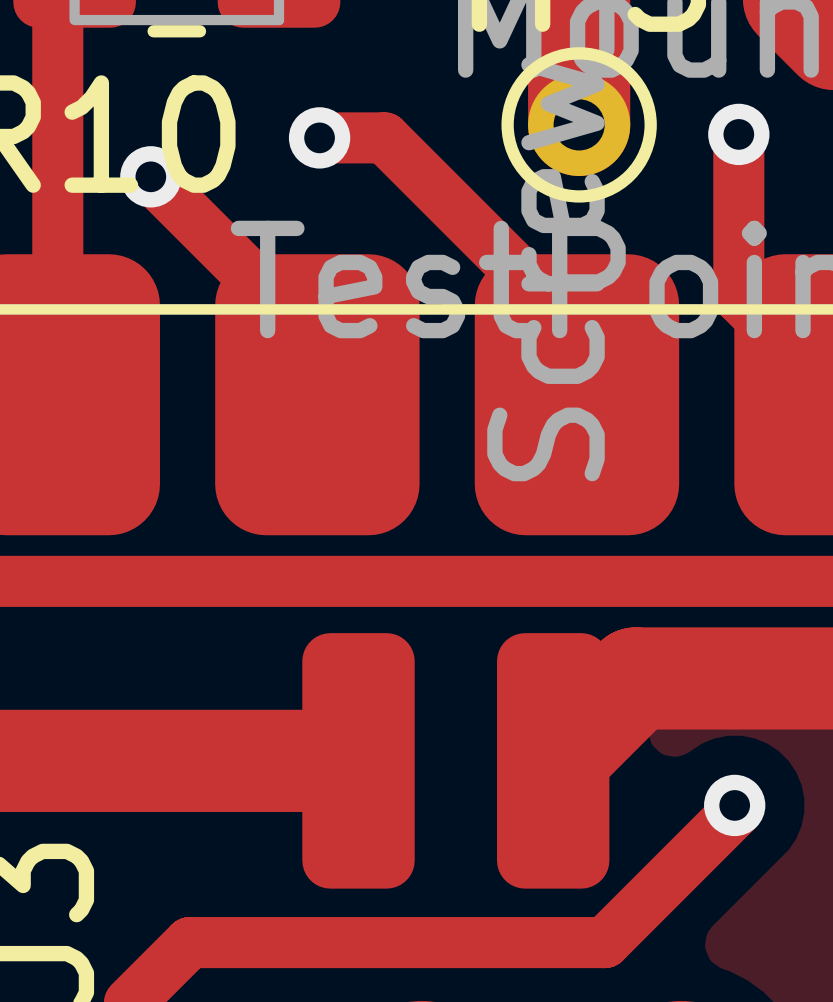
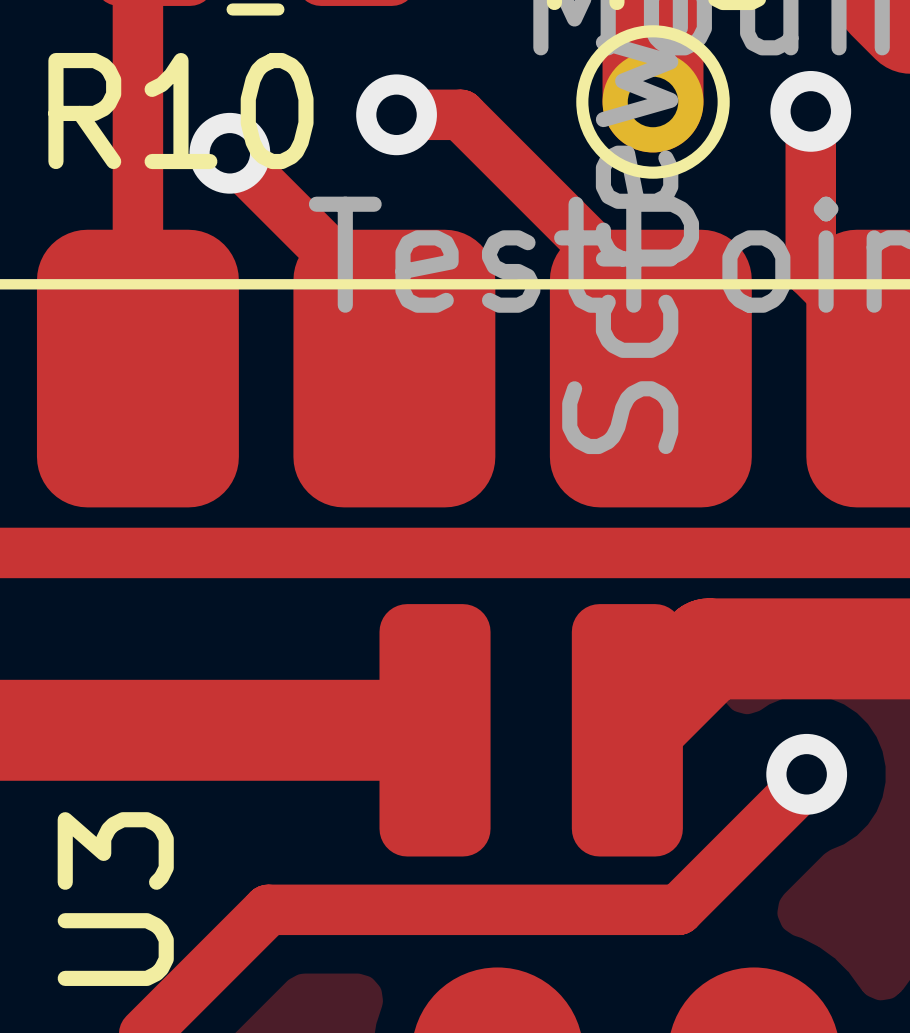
via size: [708, 103, 770, 166] -> [770, 70, 852, 152]
via size: [288, 107, 351, 169] -> [356, 74, 437, 156]
via size: [120, 146, 182, 208] -> [189, 112, 271, 194]
via size: [704, 774, 766, 837] -> [766, 733, 848, 815]

